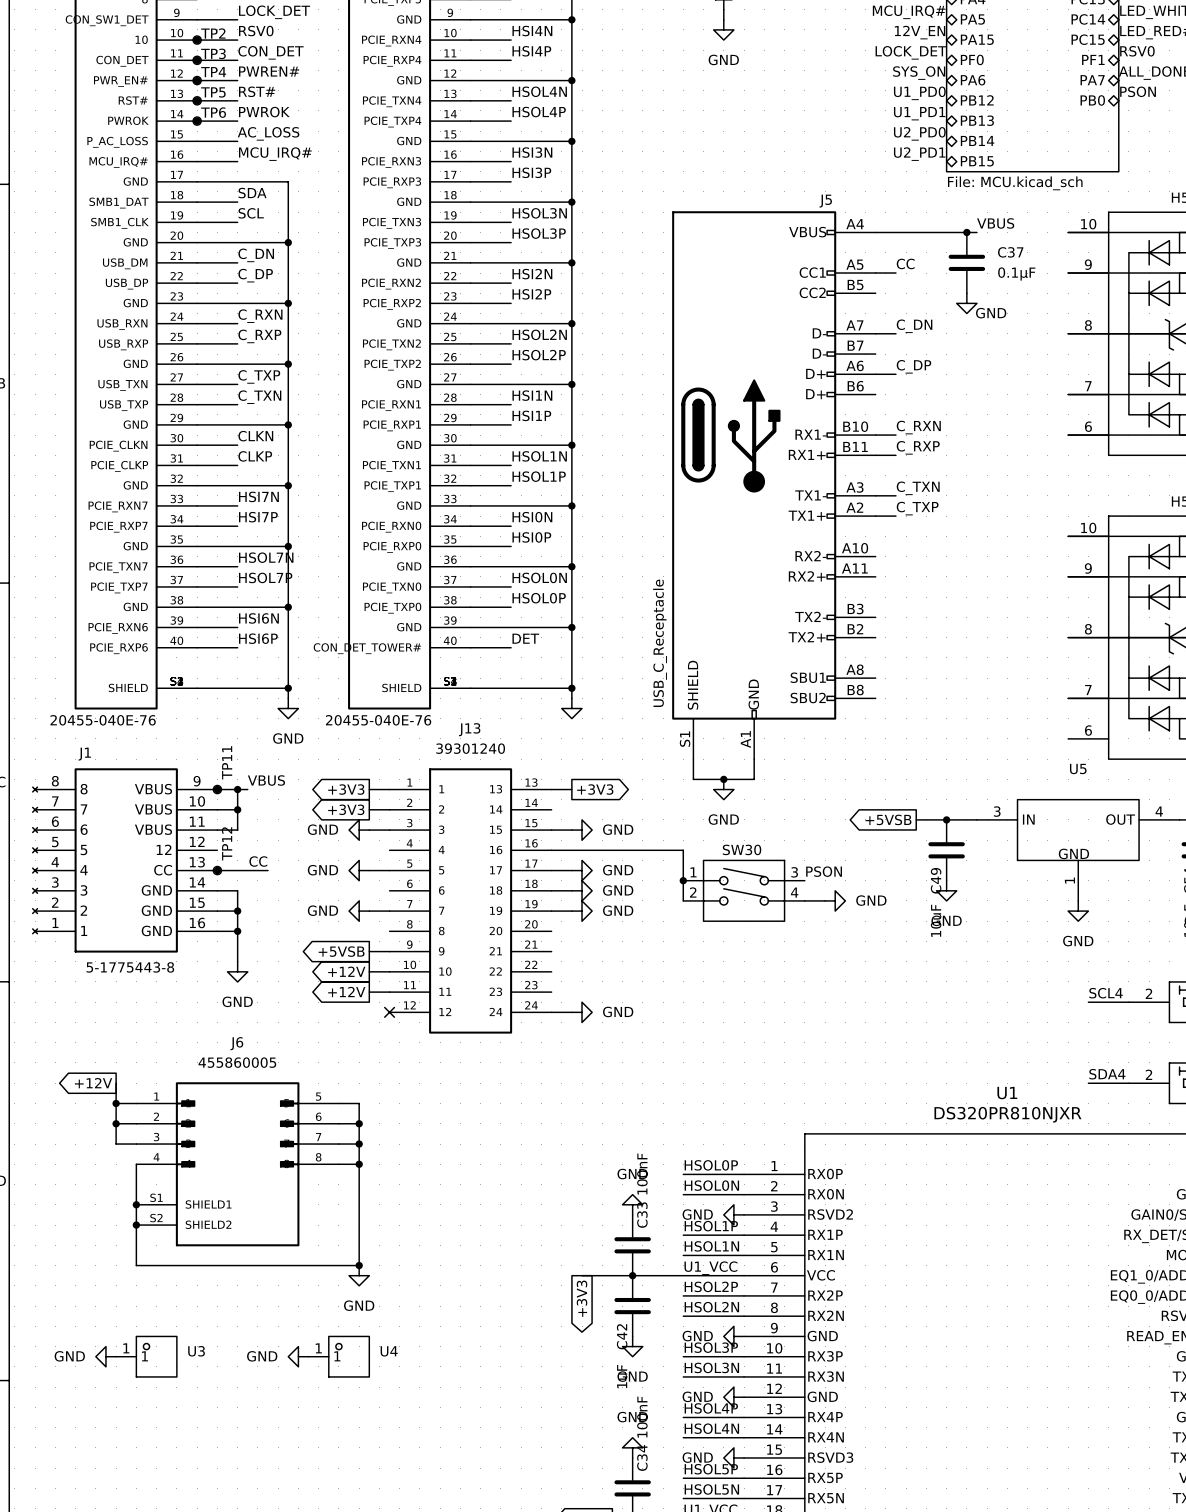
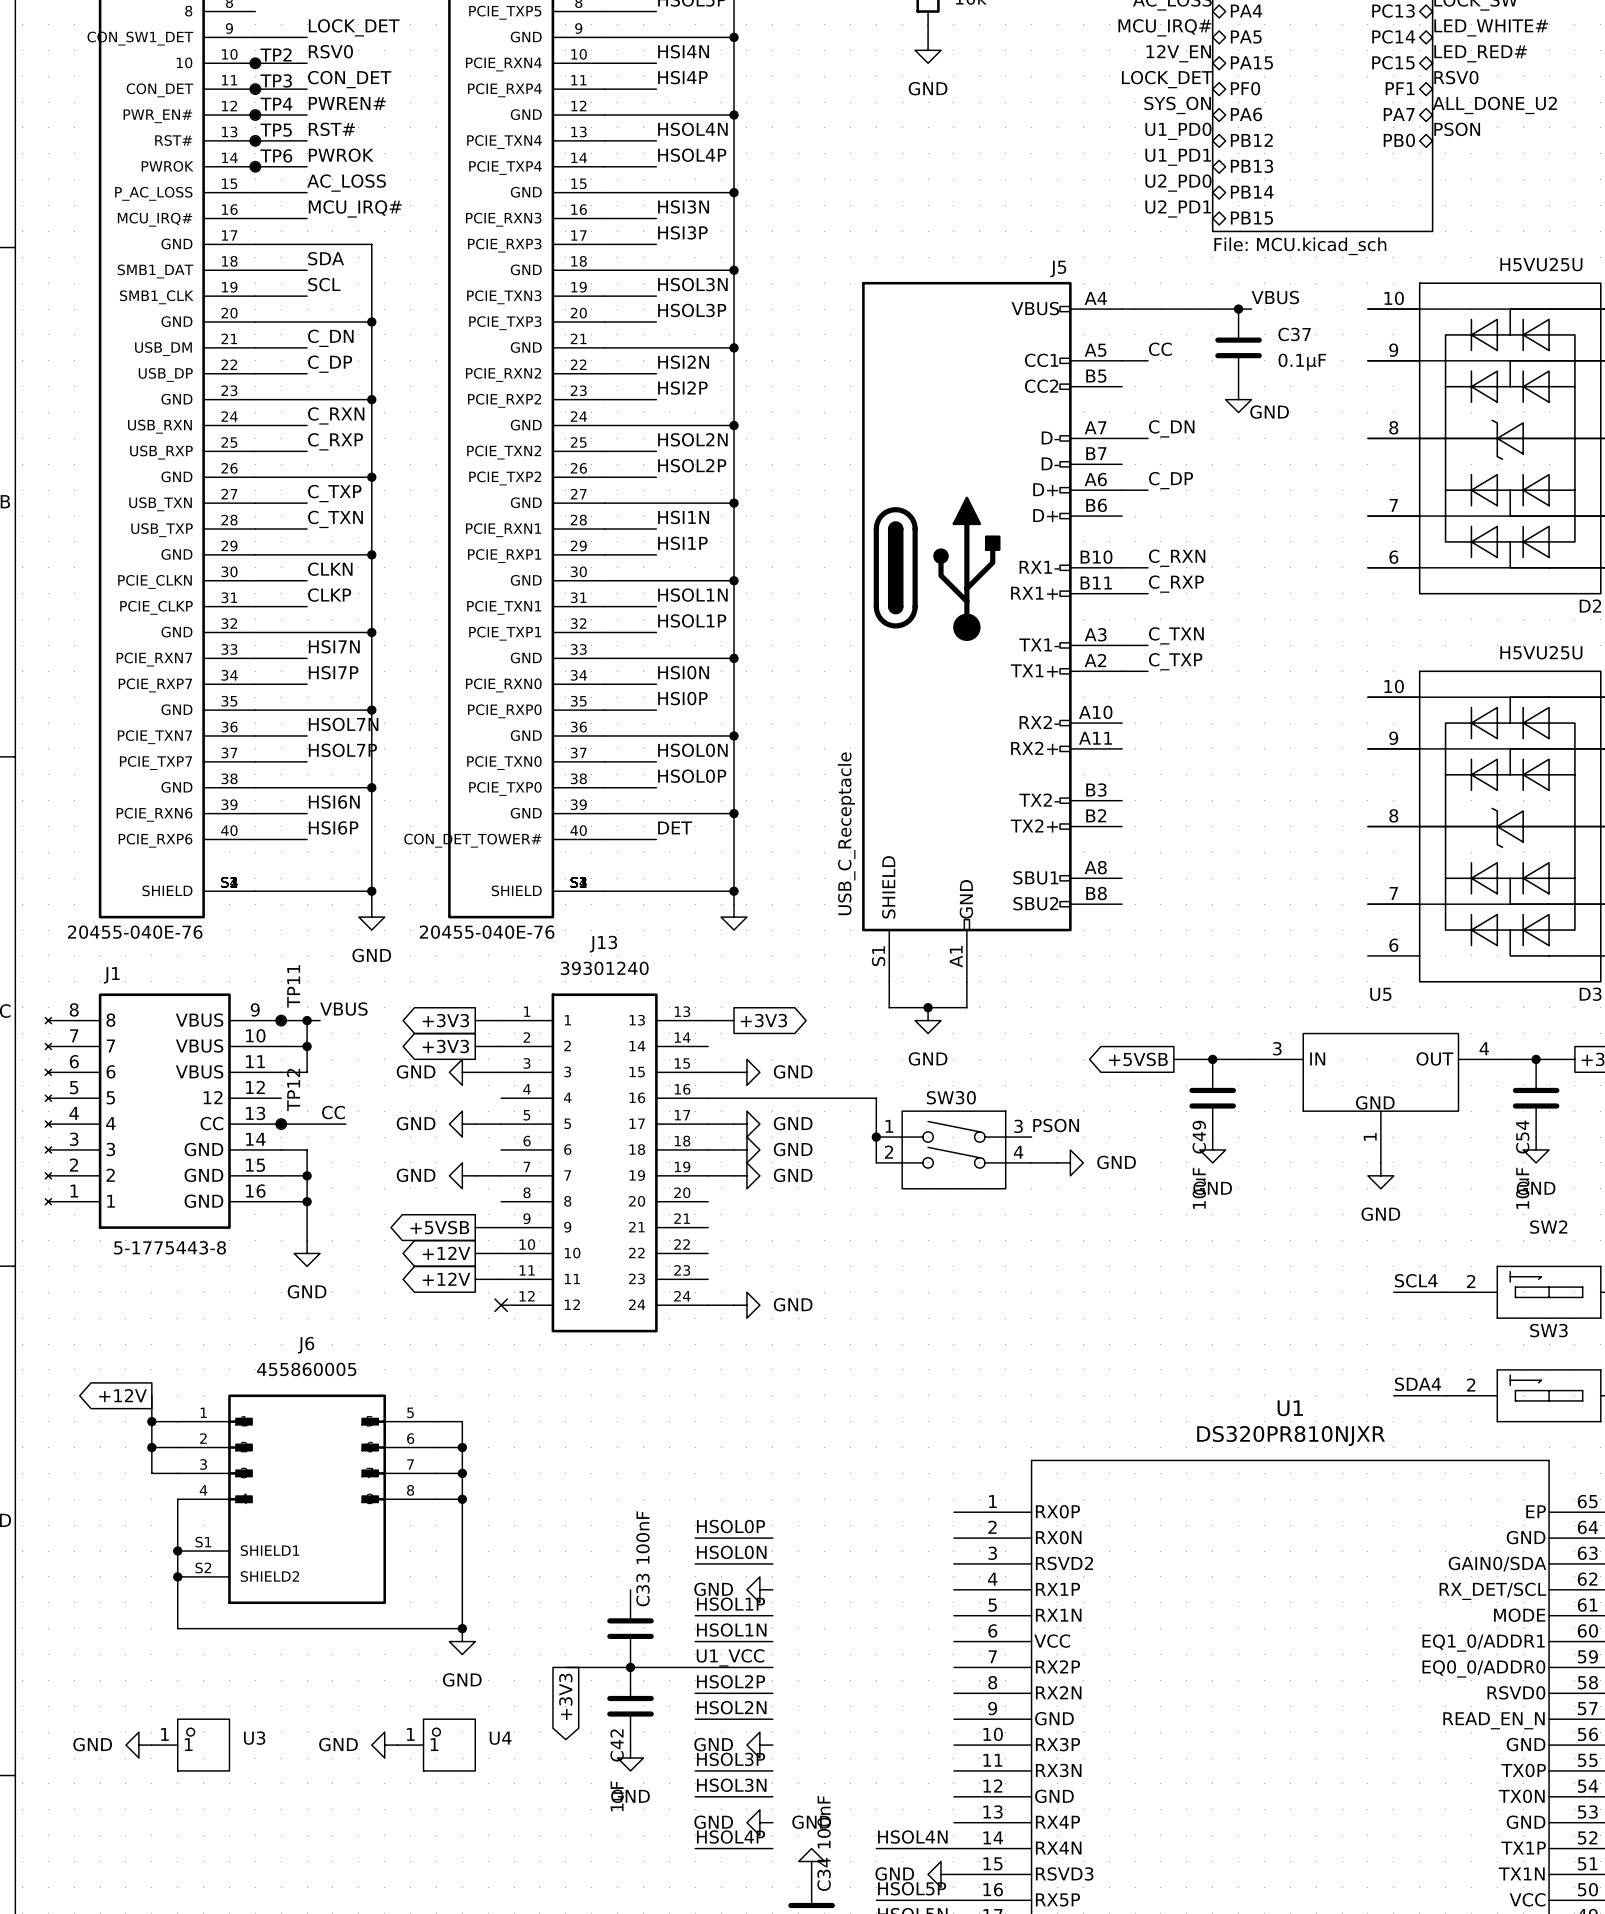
label position: HSOL0P (711, 1165) -> HSOL0P (730, 1526)
wire: (683, 1174) (744, 1174) -> (695, 1538) (772, 1538)
label position: HSOL0N (711, 1185) -> HSOL0N (731, 1552)
wire: (683, 1194) (744, 1194) -> (695, 1563) (772, 1563)
power symbol rotation: 0° (632, 1204) -> 90° counterclockwise (759, 1589)
power symbol position: GND (632, 1204) -> GND (759, 1589)
power symbol: GND (733, 1214) -> none
label position: HSOL1P (711, 1226) -> HSOL1P (730, 1604)
wire: (683, 1235) (744, 1235) -> (695, 1615) (772, 1615)
C33 position: (632, 1245) -> (630, 1628)
label position: HSOL1N (711, 1246) -> HSOL1N (731, 1630)
wire: (683, 1255) (744, 1255) -> none
label position: U1_VCC (710, 1268) -> U1_VCC (730, 1657)
wire: none -> (695, 1641) (746, 1641)
wire: (602, 1275) (744, 1275) -> none
junction: (632, 1275) -> none
label position: HSOL2P (711, 1286) -> HSOL2P (730, 1681)
wire: none -> (565, 1667) (772, 1667)
junction: none -> (630, 1667)
wire: (683, 1295) (744, 1295) -> (695, 1693) (772, 1693)
global label: +3V3 (582, 1298) -> none
C42 position: (632, 1306) -> (630, 1706)
label position: HSOL2N (711, 1307) -> HSOL2N (731, 1707)
wire: (683, 1316) (744, 1316) -> (695, 1719) (772, 1719)
global label: none -> +3V3 (565, 1696)
power symbol: GND (733, 1336) -> none
power symbol: GND (632, 1346) -> none
label position: HSOL3P (711, 1347) -> HSOL3P (730, 1759)
power symbol: none -> GND (759, 1745)
wire: (683, 1356) (744, 1356) -> (695, 1770) (772, 1770)
power symbol: none -> GND (630, 1758)
label position: HSOL3N (711, 1367) -> HSOL3N (731, 1785)
wire: (683, 1376) (744, 1376) -> (695, 1796) (772, 1796)
power symbol: GND (733, 1397) -> none
label position: HSOL4P (711, 1408) -> HSOL4P (730, 1837)
power symbol: none -> GND (759, 1822)
wire: (683, 1417) (744, 1417) -> (695, 1848) (772, 1848)

